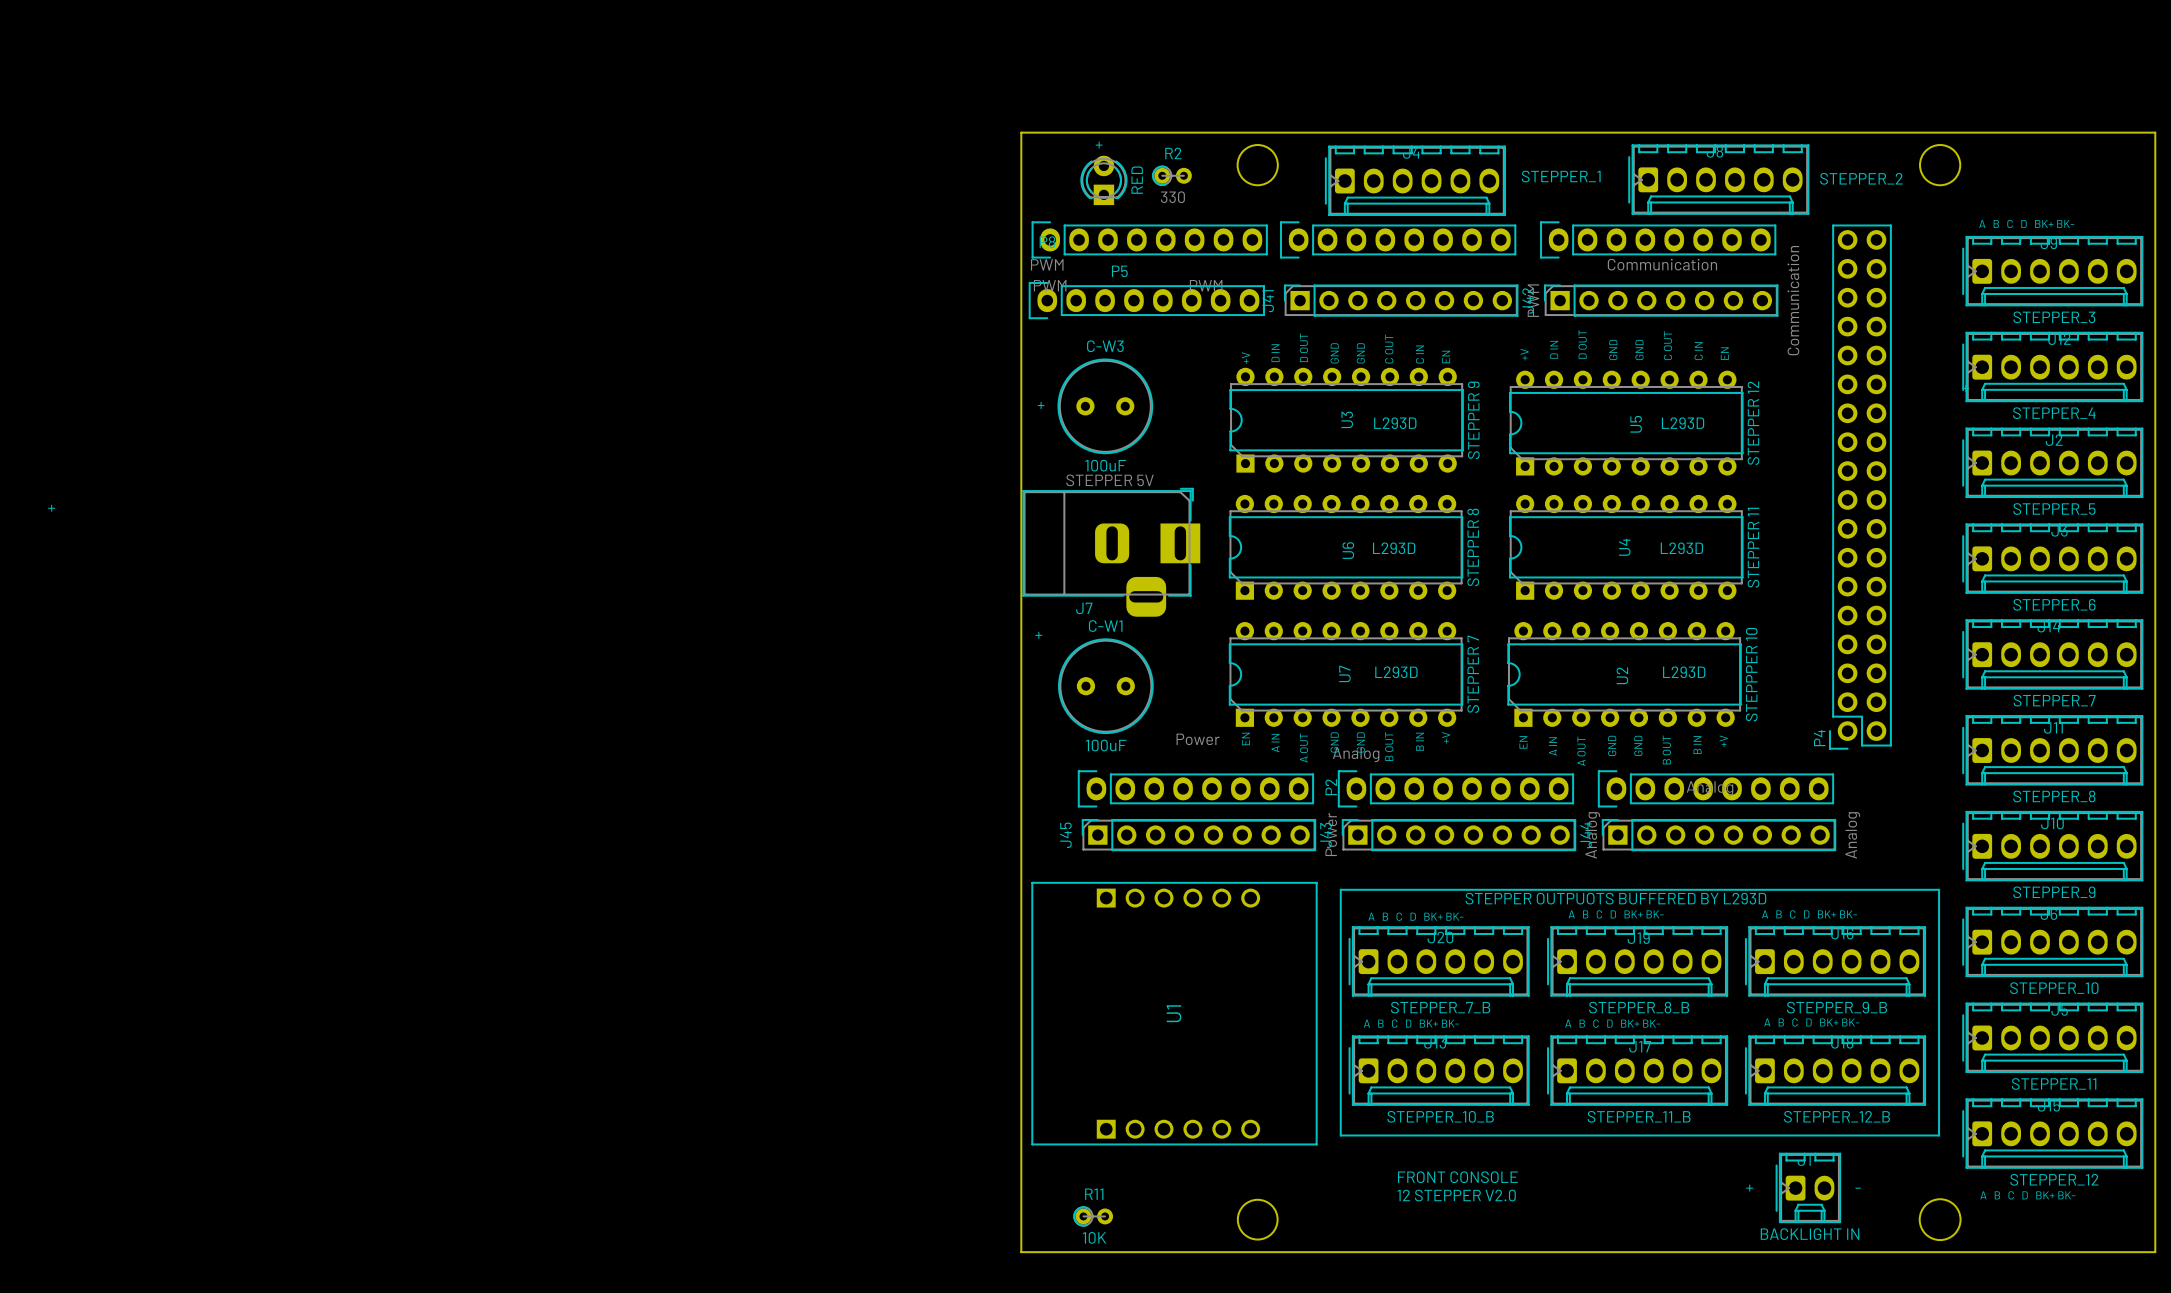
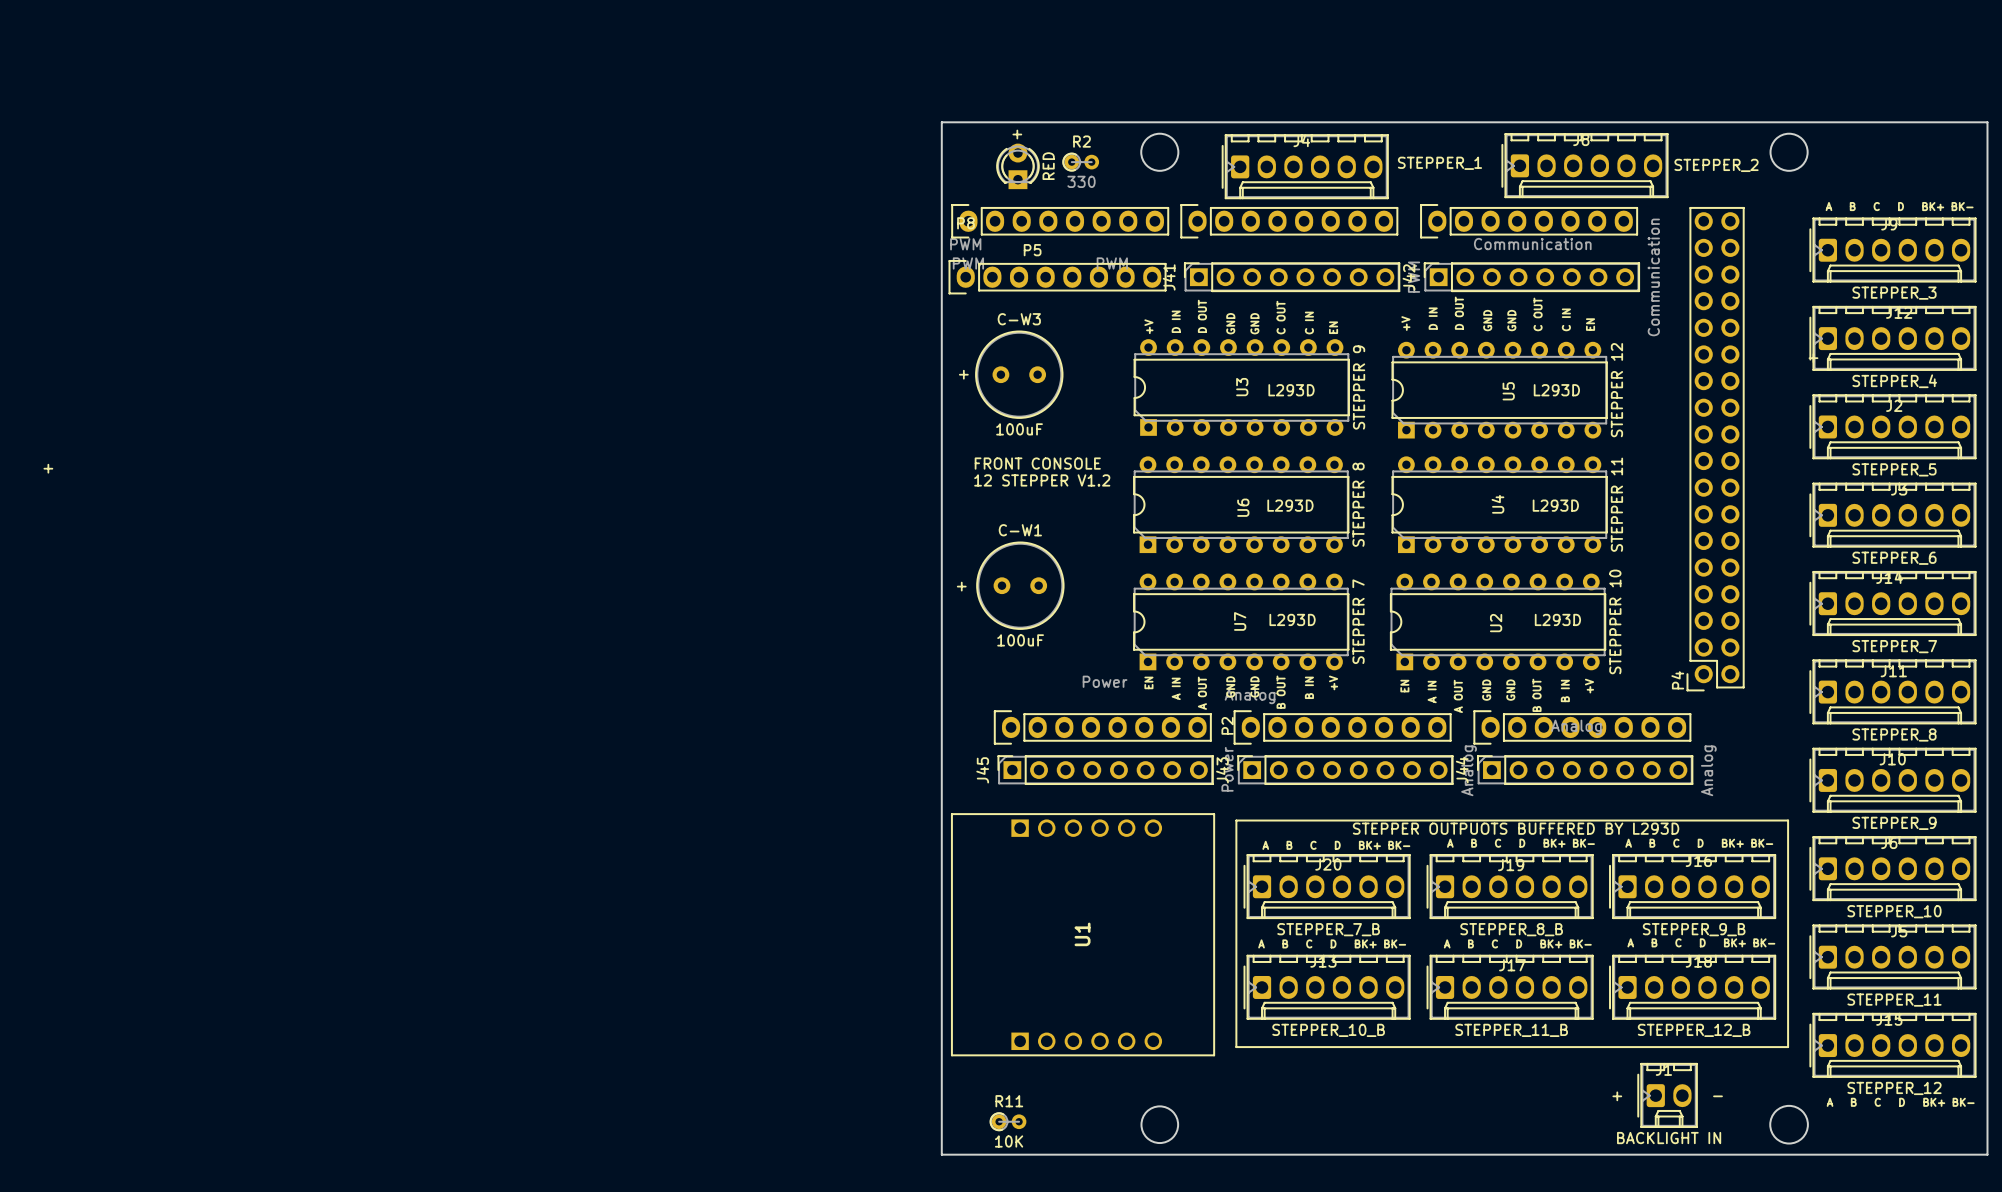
text: none -> FRONT CONSOLE (1037, 463)
text: none -> 12 STEPPER V1.2 (1042, 480)
J7: STEPPER 5V (1111, 552) -> none
C-W1 position: (1105, 686) -> (1020, 585)
text: FRONT CONSOLE (1457, 1177) -> none
text: 12 STEPPER V2.0 (1456, 1195) -> none

